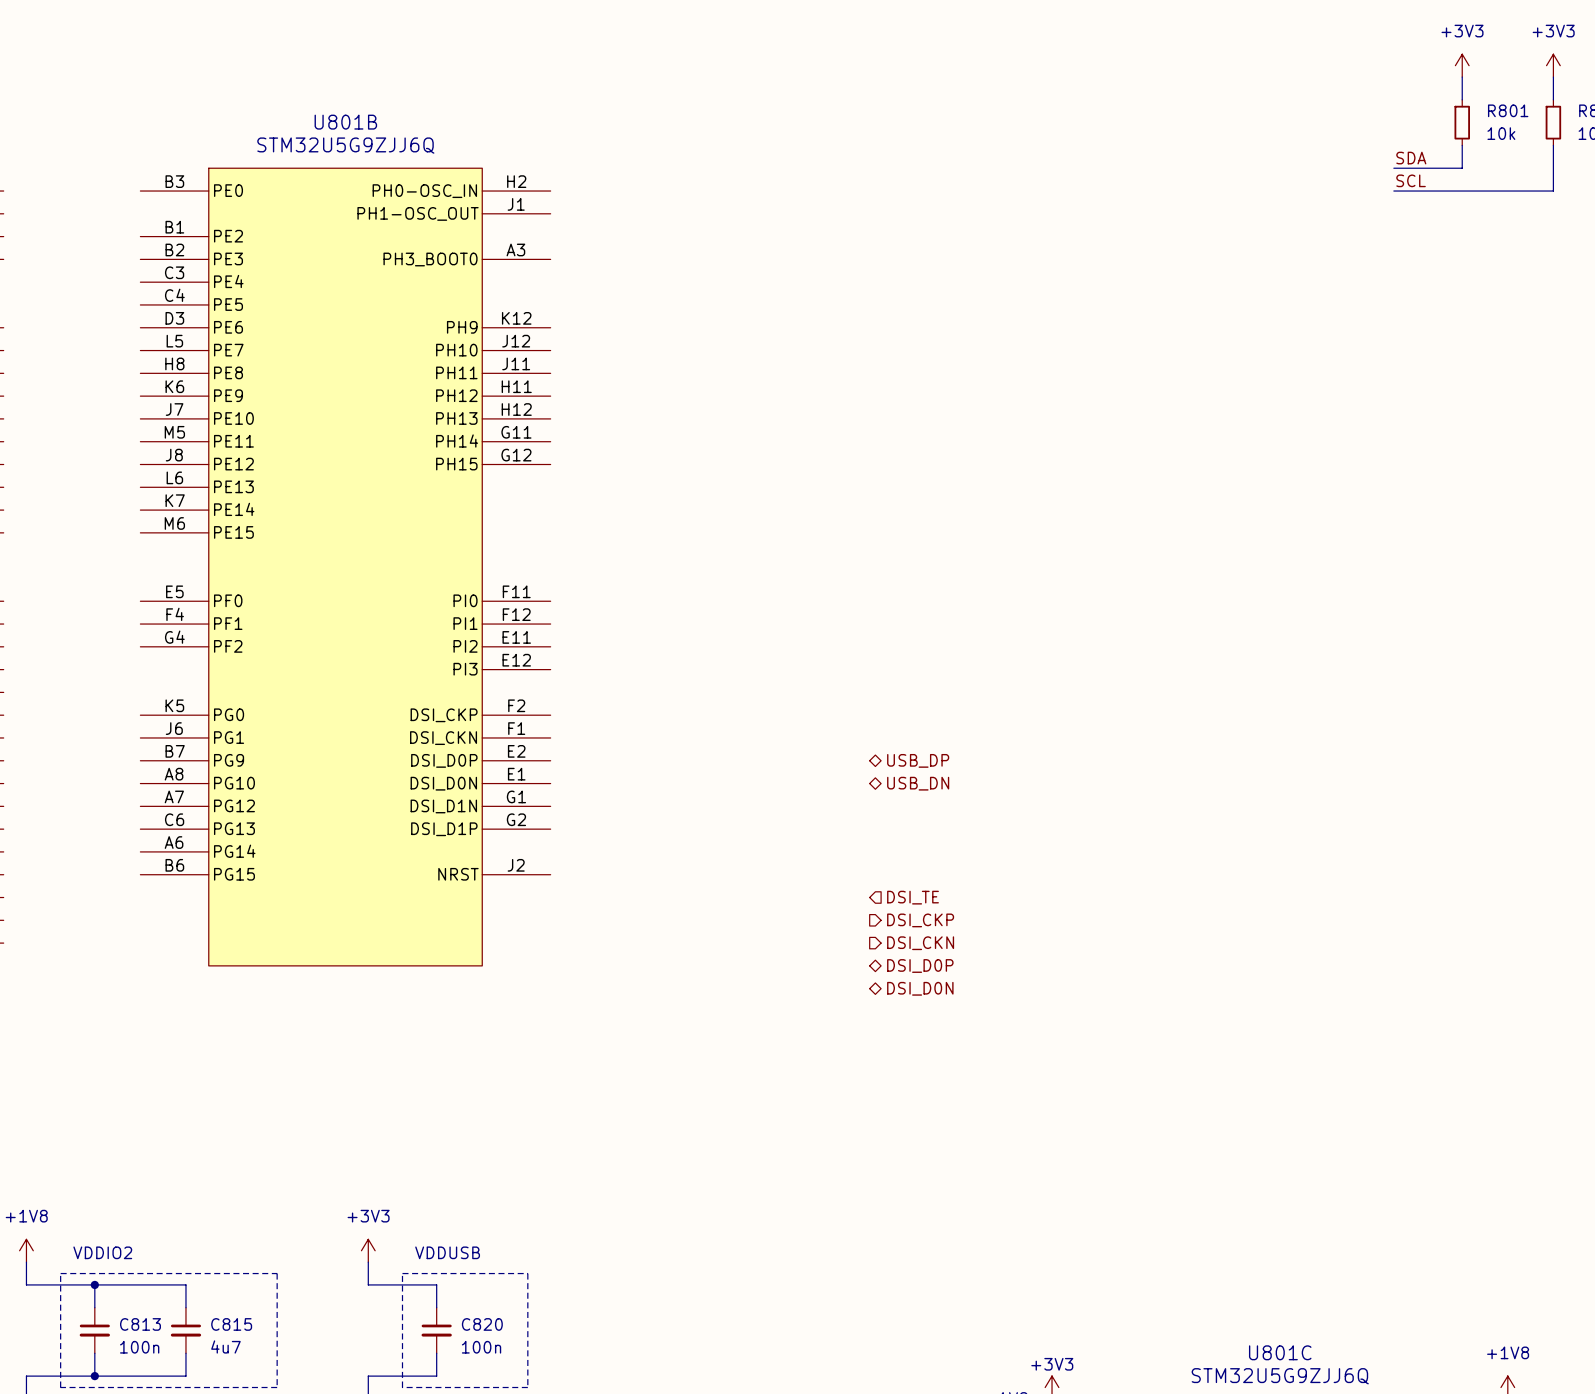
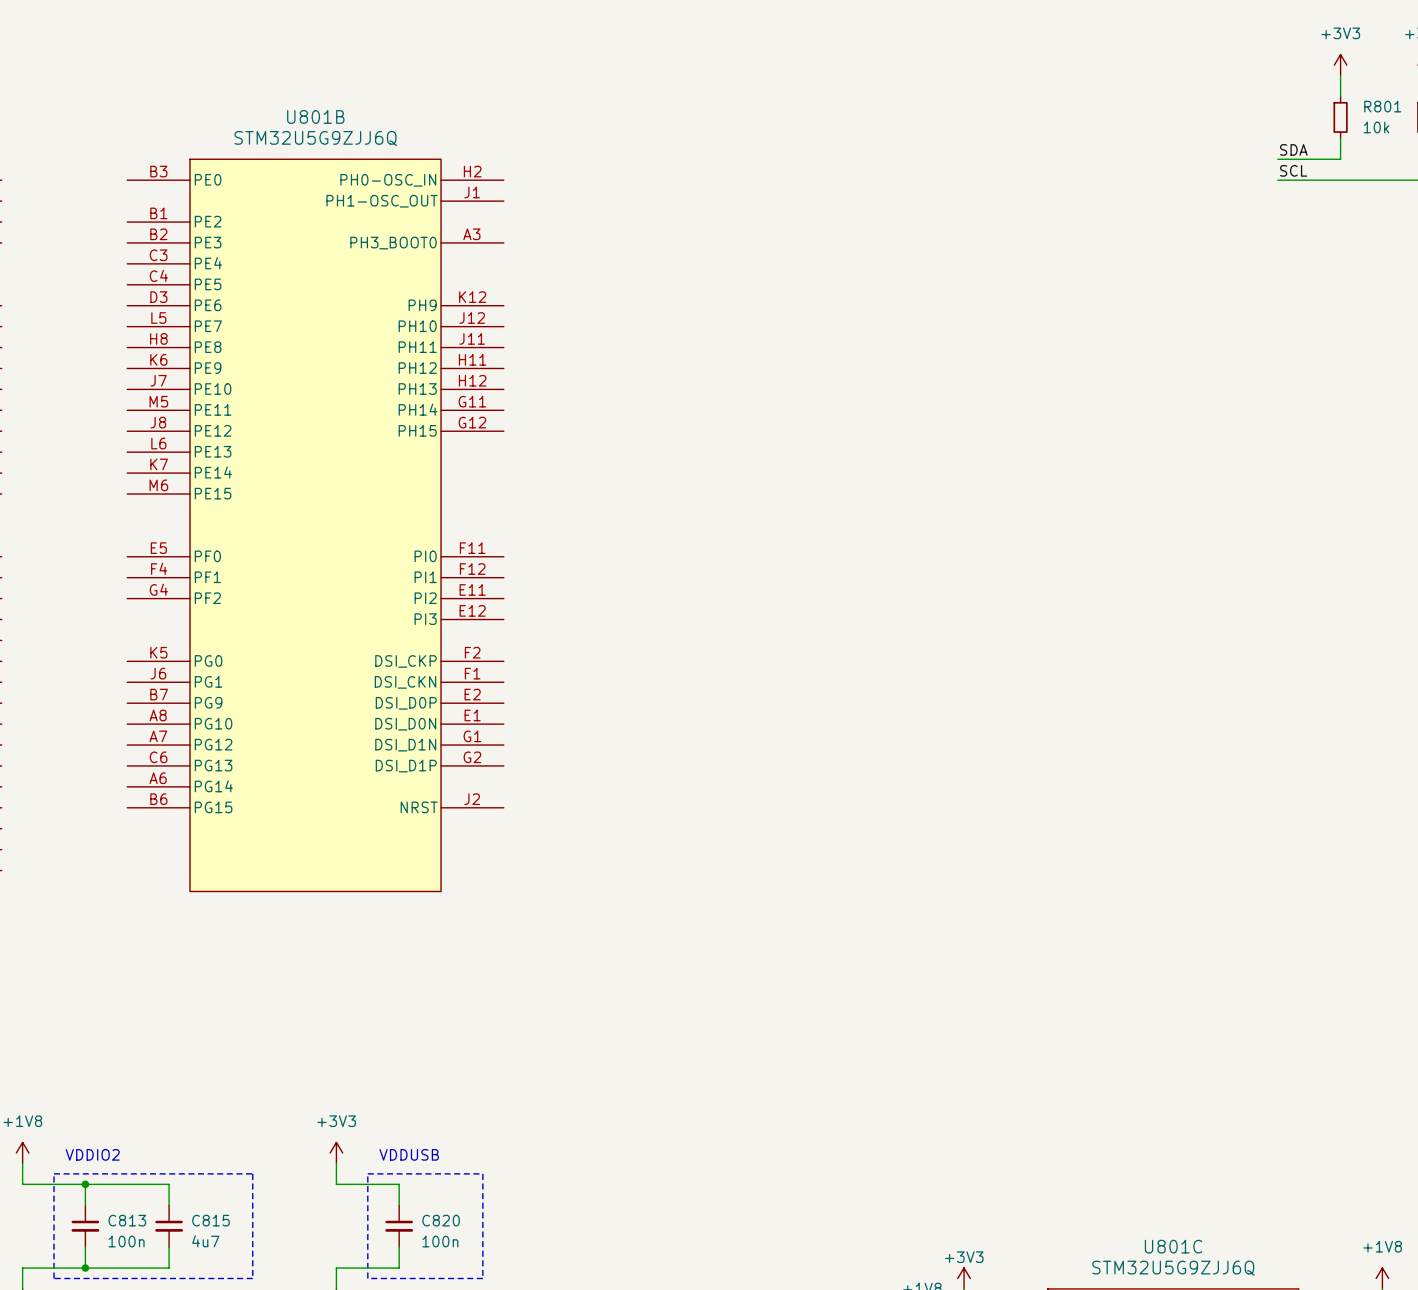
hierarchical label: USB_DP (918, 760) -> none
hierarchical label: USB_DN (918, 783) -> none
hierarchical label: DSI_TE (913, 897) -> none
hierarchical label: DSI_CKP (920, 920) -> none
hierarchical label: DSI_CKN (920, 943) -> none
hierarchical label: DSI_D0P (920, 966) -> none
hierarchical label: DSI_D0N (920, 988) -> none

